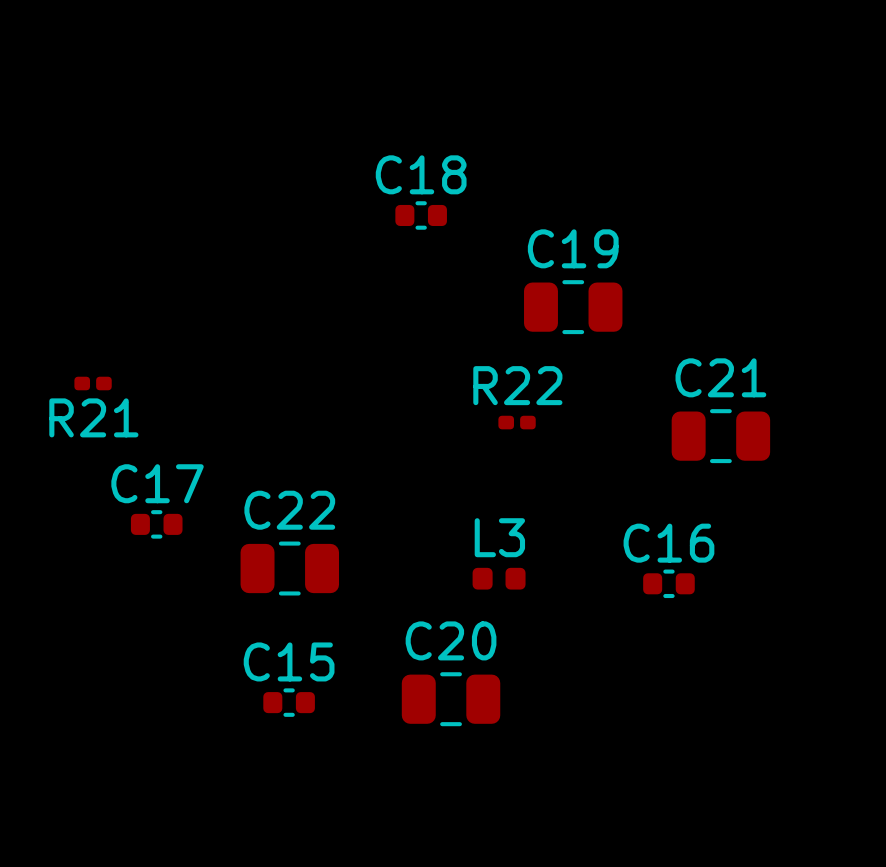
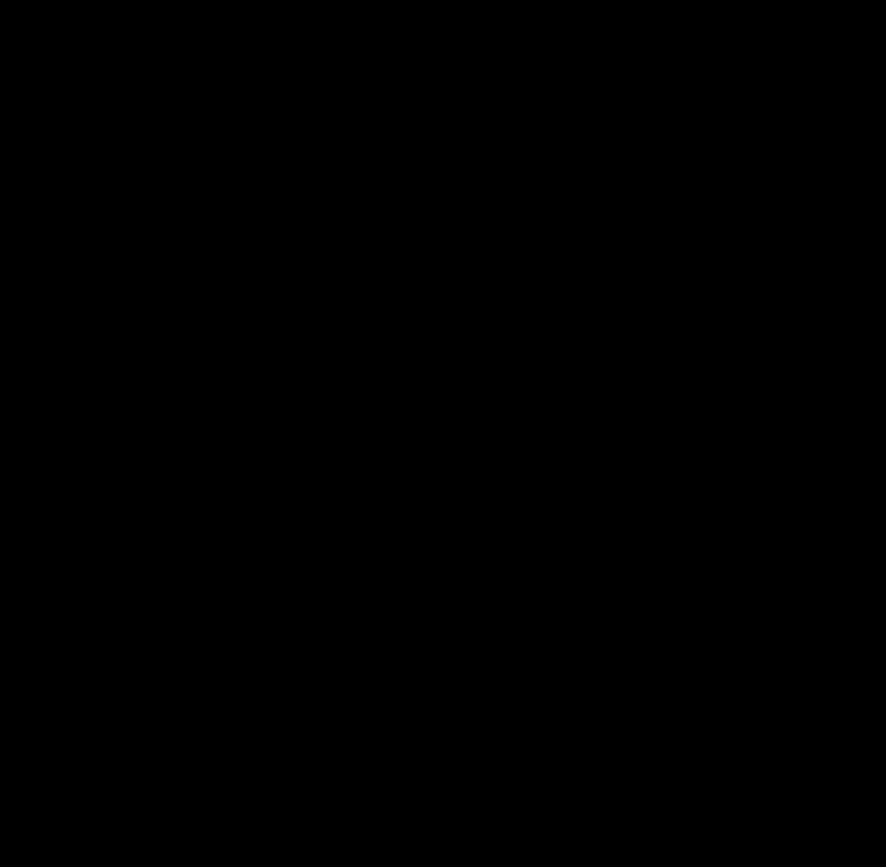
C18: (421, 215) -> none
C19: (573, 307) -> none
R21: (93, 383) -> none
R22: (517, 422) -> none
C21: (720, 436) -> none
C17: (156, 524) -> none
C22: (289, 568) -> none
L3: (499, 578) -> none
C16: (668, 583) -> none
C20: (451, 699) -> none
C15: (289, 702) -> none

